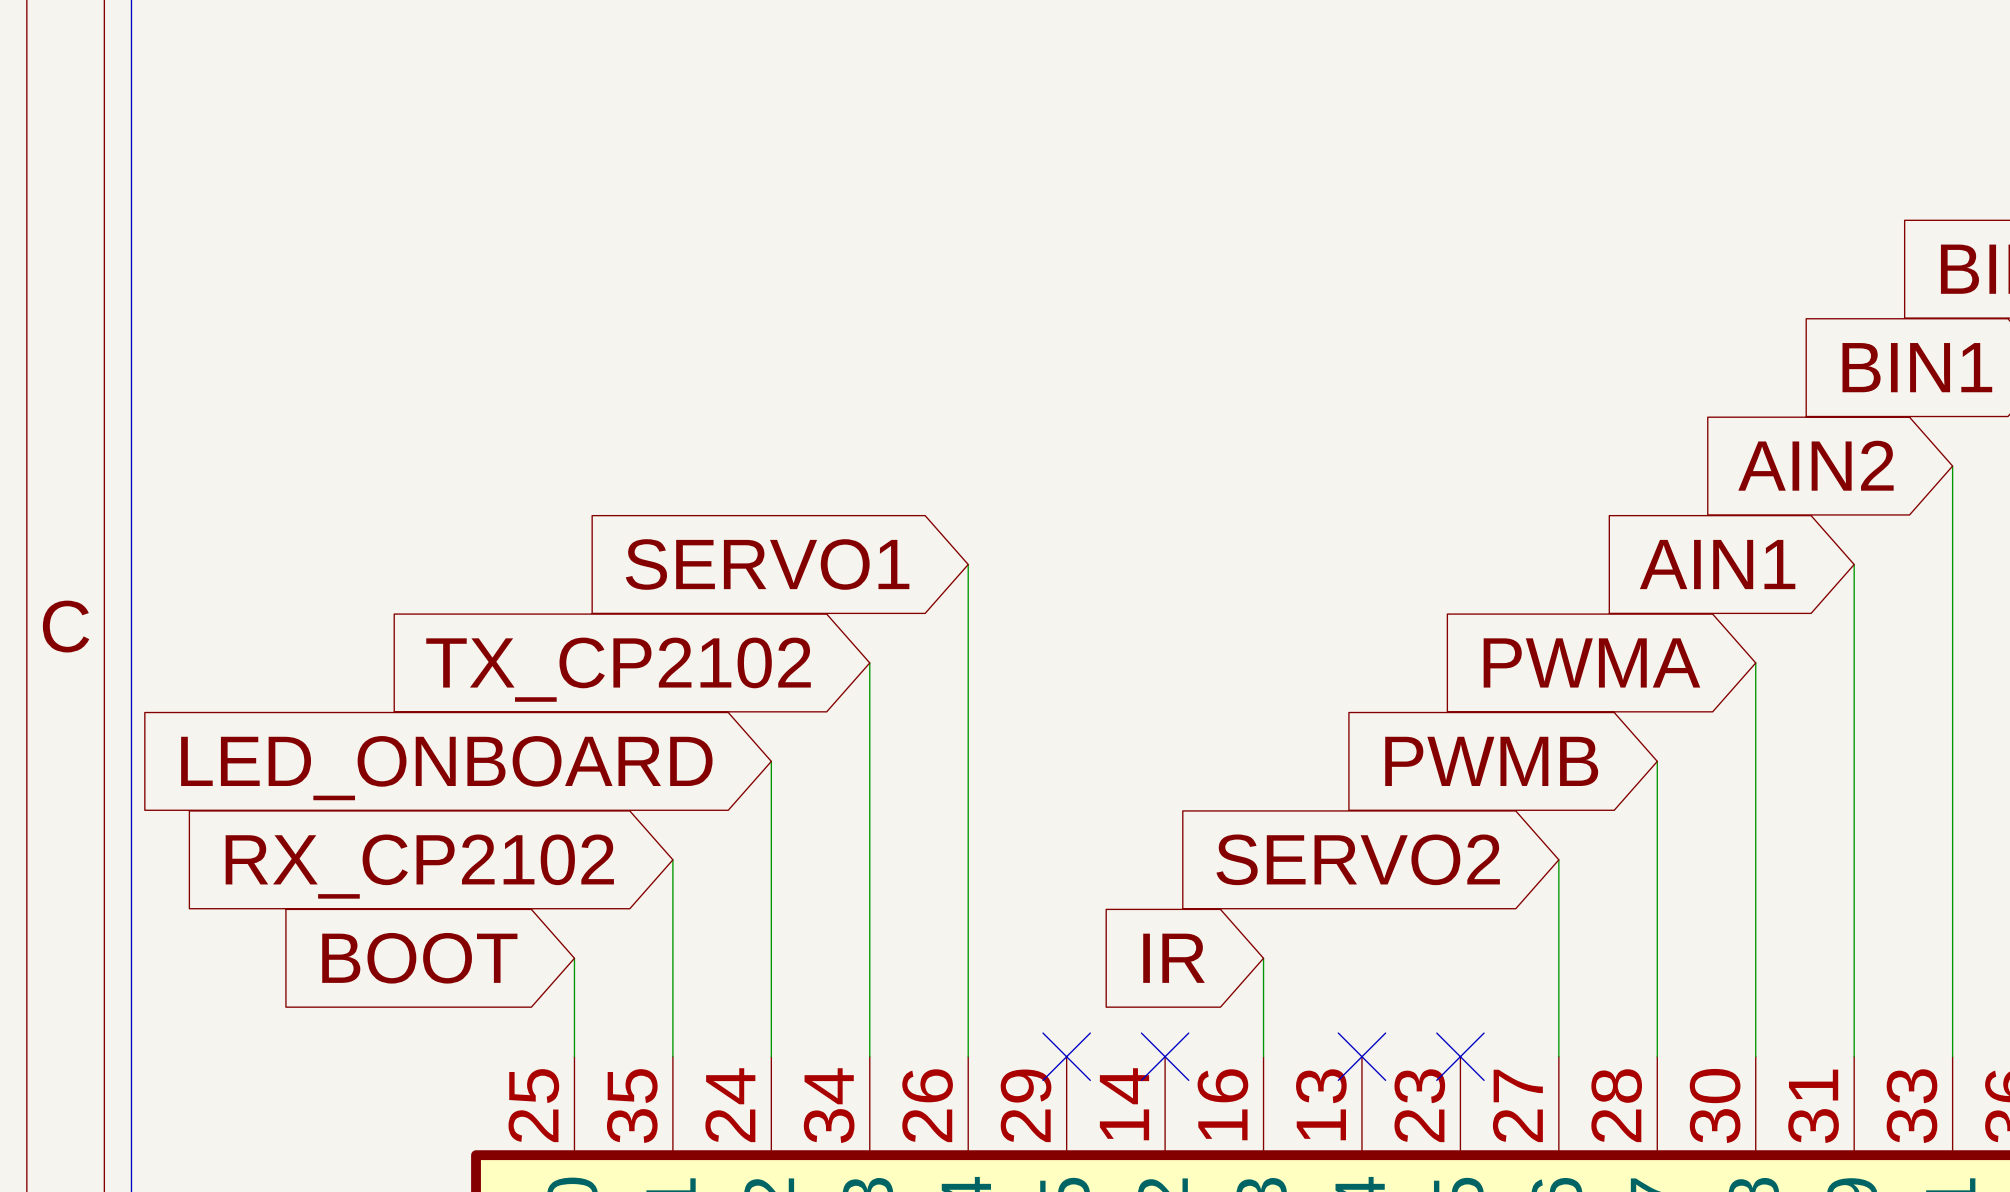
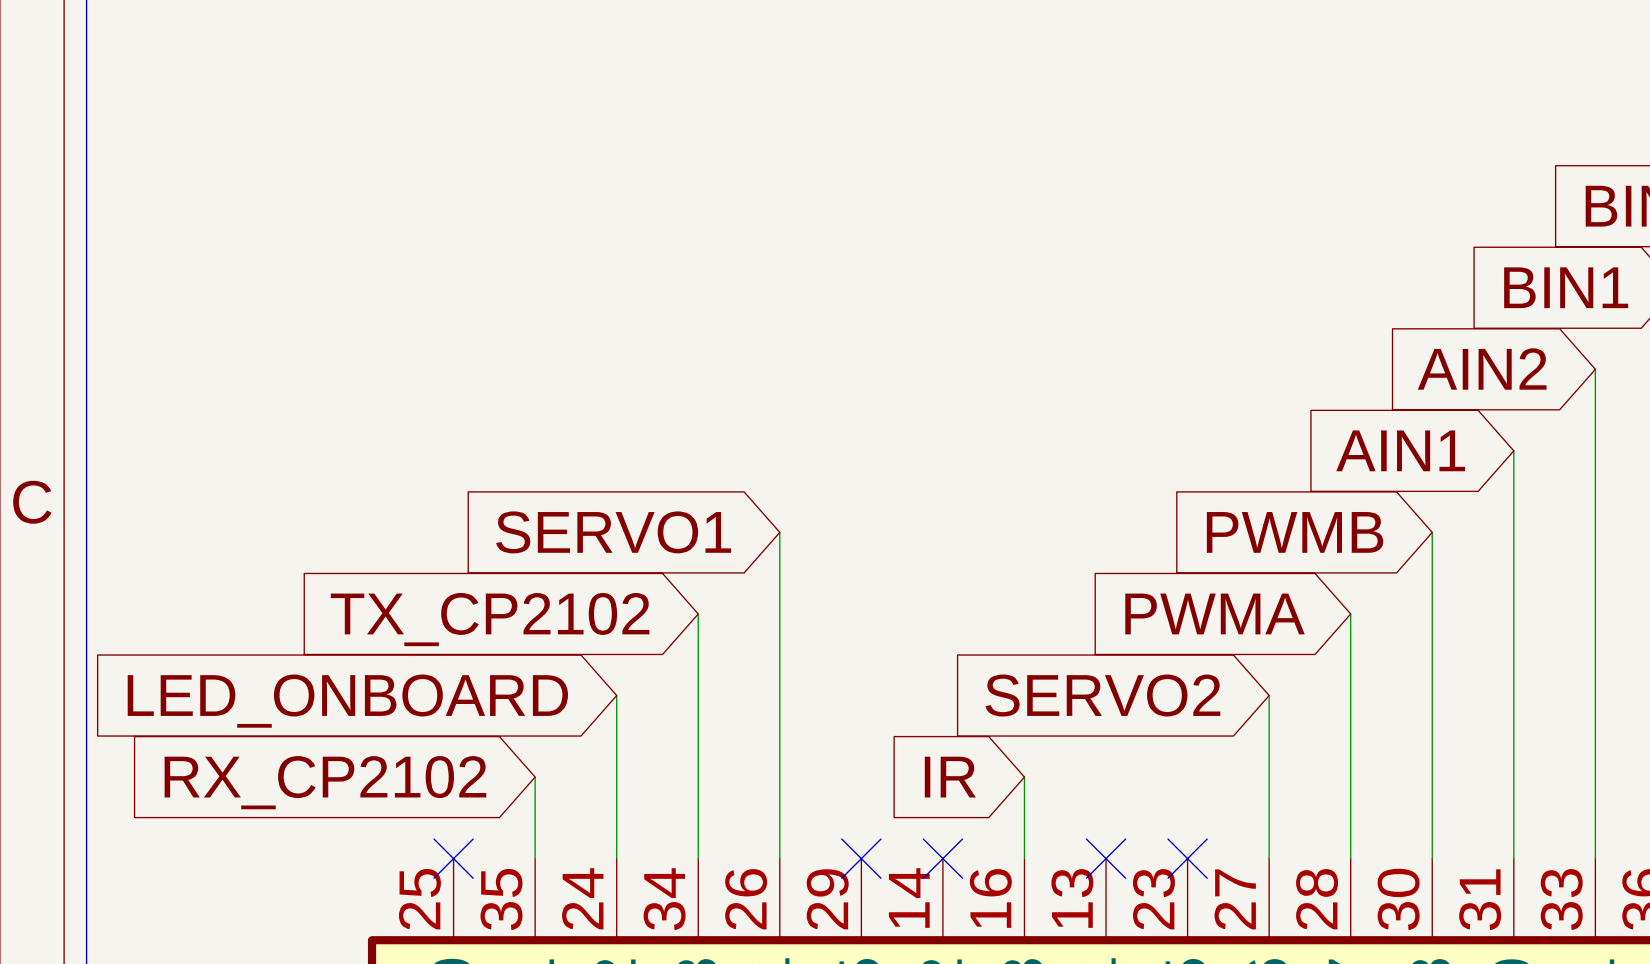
global label position: SERVO1 (767, 564) -> SERVO1 (613, 532)
wire: (968, 564) (968, 662) -> none
wire: (869, 662) (869, 761) -> none
global label: PWMA (1591, 662) -> PWMB (1295, 532)
global label position: TX_CP2102 (618, 669) -> TX_CP2102 (490, 619)
wire: (771, 761) (771, 859) -> none
global label: PWMB (1491, 761) -> PWMA (1215, 613)
global label position: LED_ONBOARD (446, 768) -> LED_ONBOARD (347, 701)
wire: (672, 859) (672, 958) -> none
global label position: RX_CP2102 (419, 866) -> RX_CP2102 (325, 782)
global label: BOOT (419, 958) -> none
wire: (574, 958) (574, 1056) -> none
no-connect mark: none -> (453, 858)

